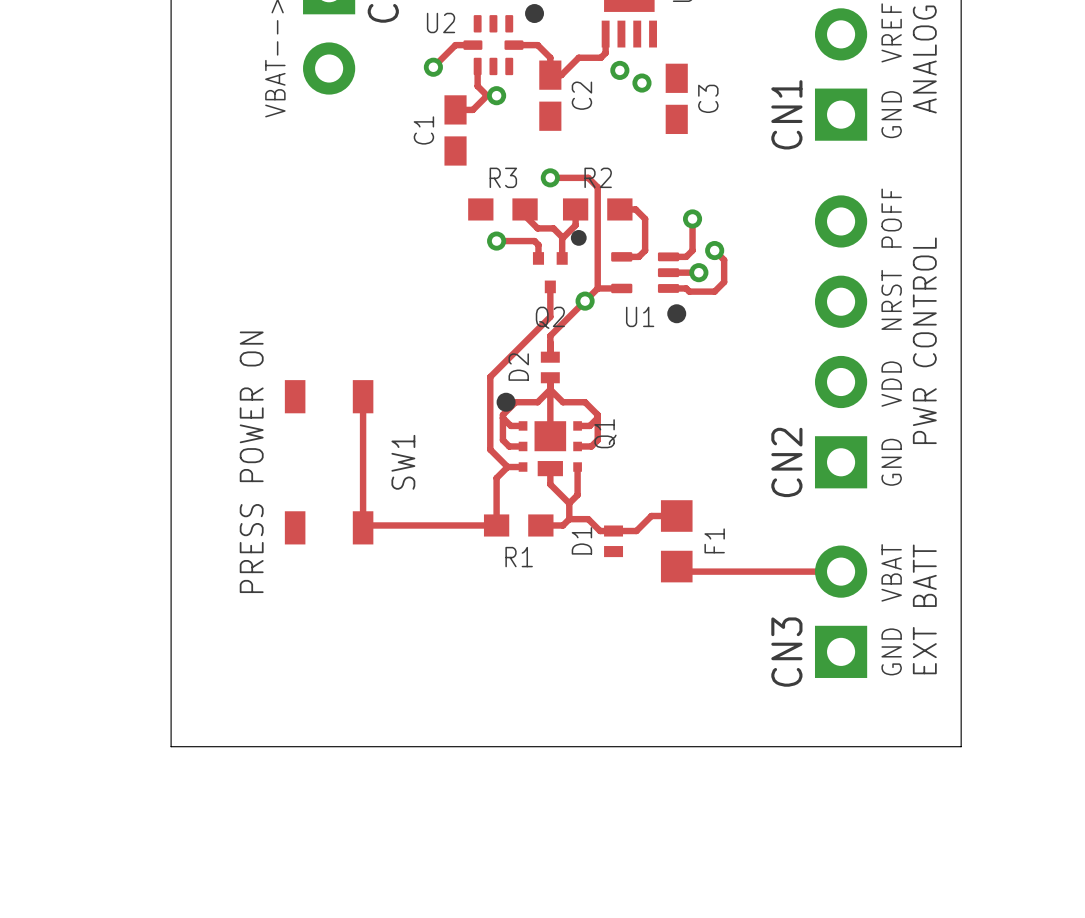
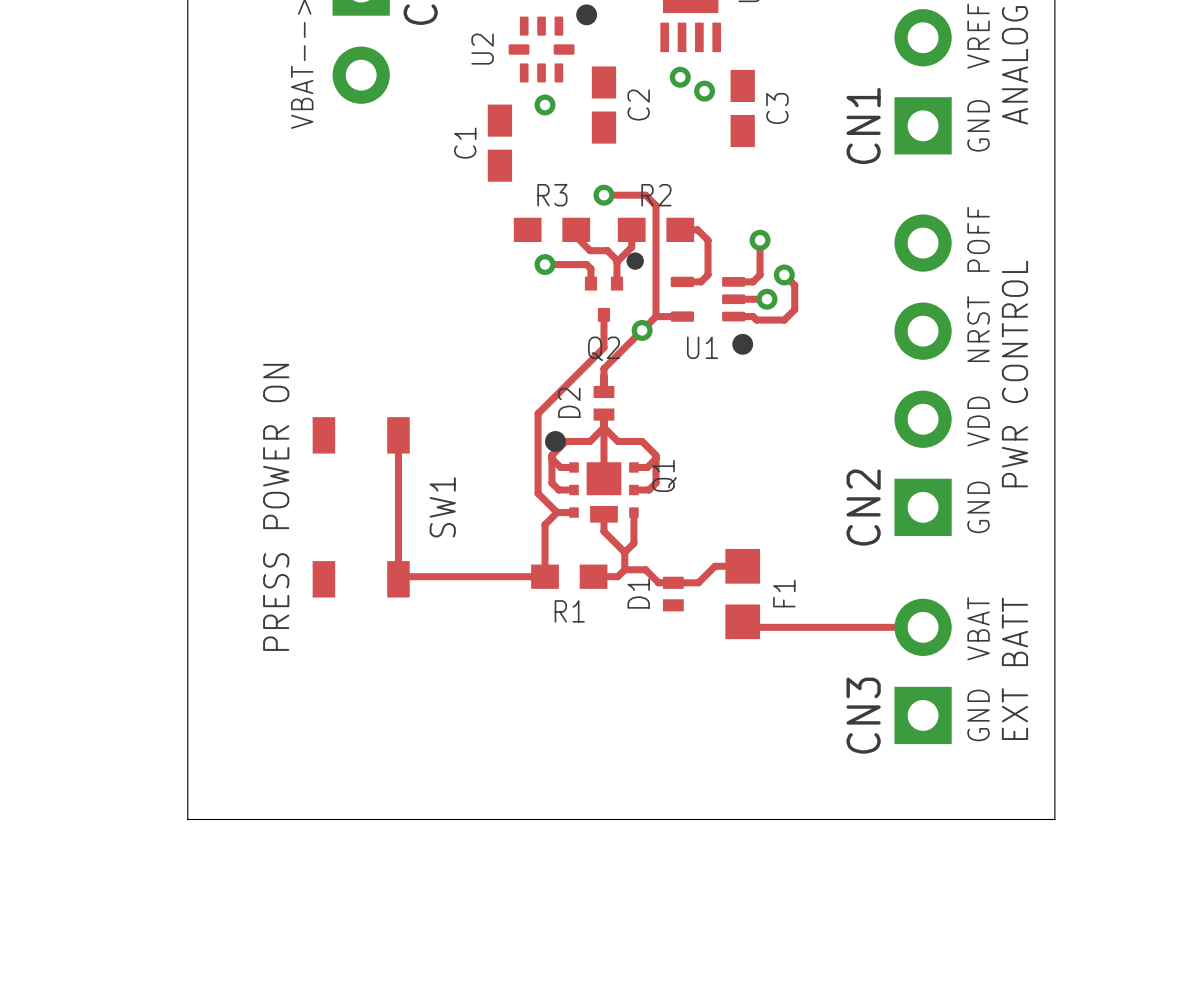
U2 name rotation: 0° (441, 23) -> 90° counterclockwise (482, 49)
track: (605, 34) (605, 53) (600, 57) (578, 57) (561, 75) (550, 75) (550, 57) (537, 45) (513, 45) -> none
track: (472, 45) (455, 45) (433, 67) -> none
track: (477, 66) (477, 86) (487, 95) -> none
via: (433, 67) -> none
track: (487, 95) (472, 109) (455, 109) -> none

